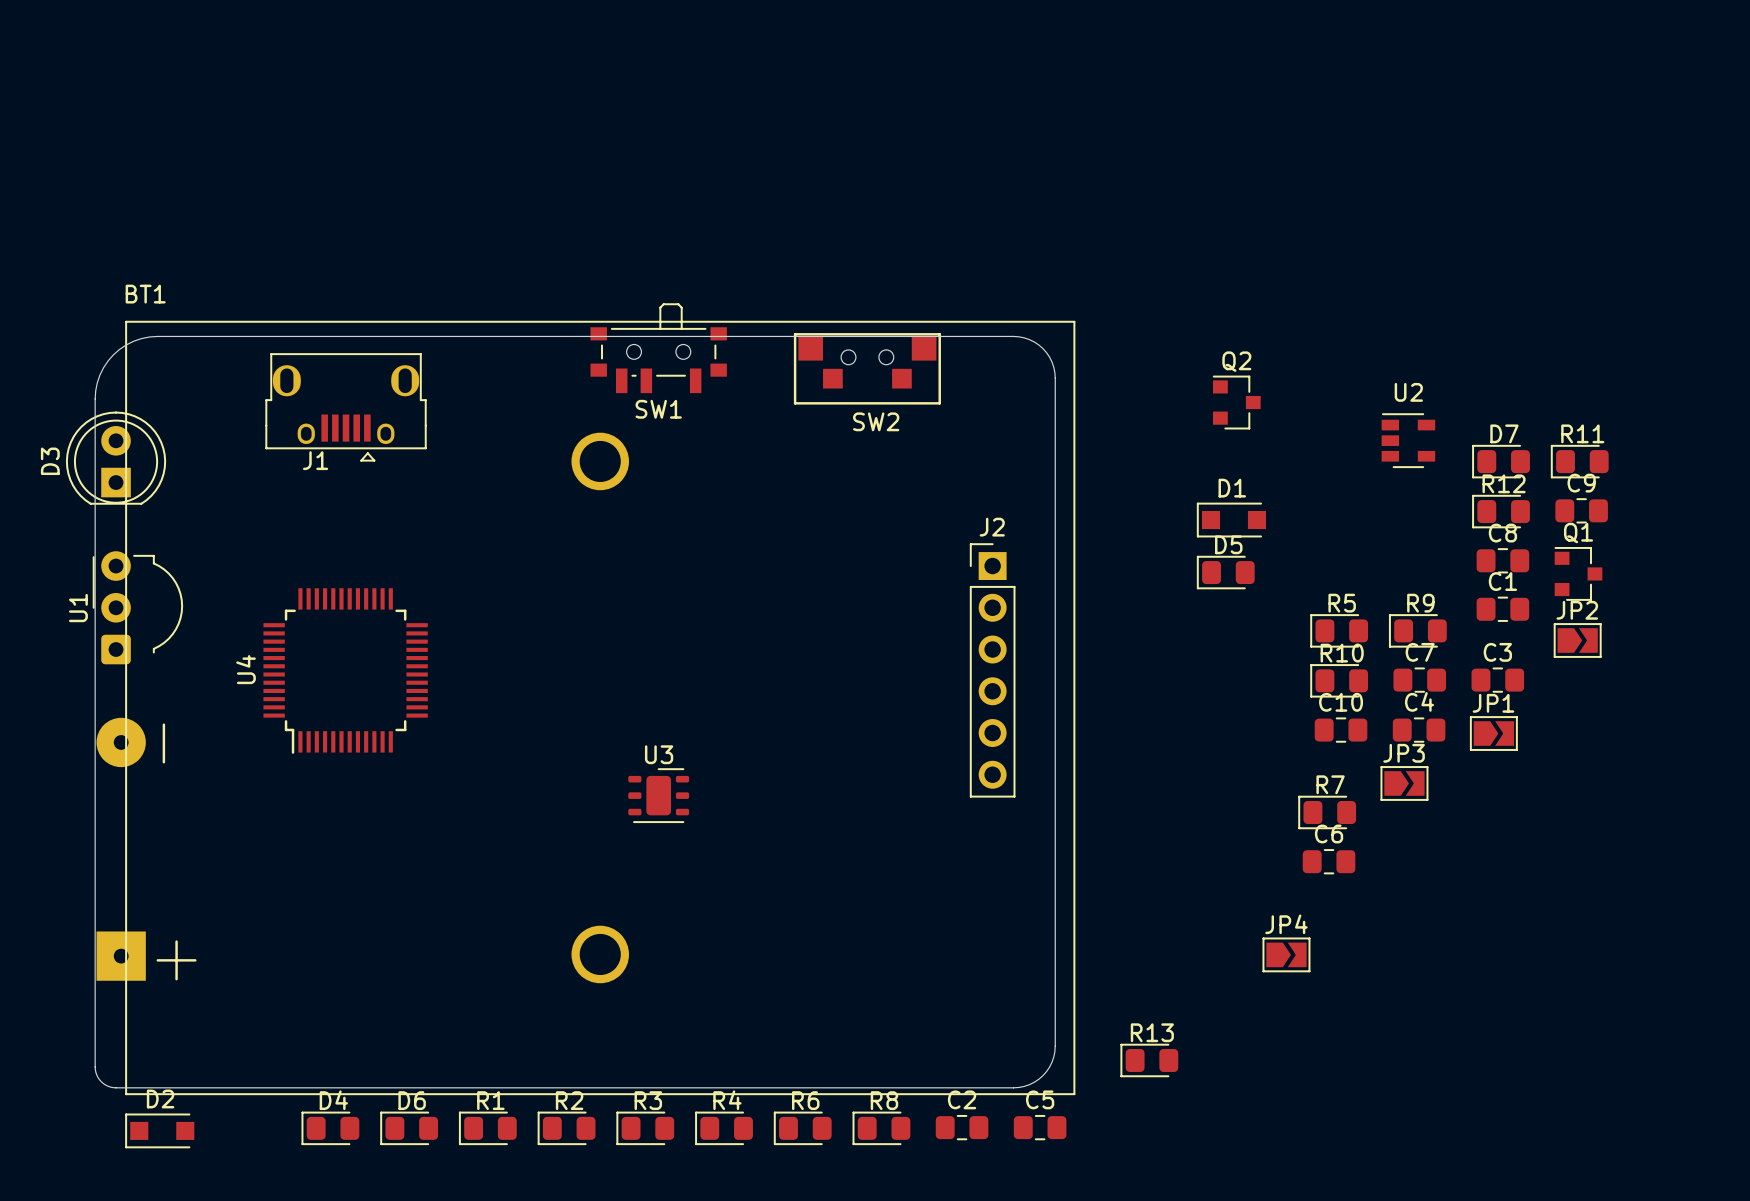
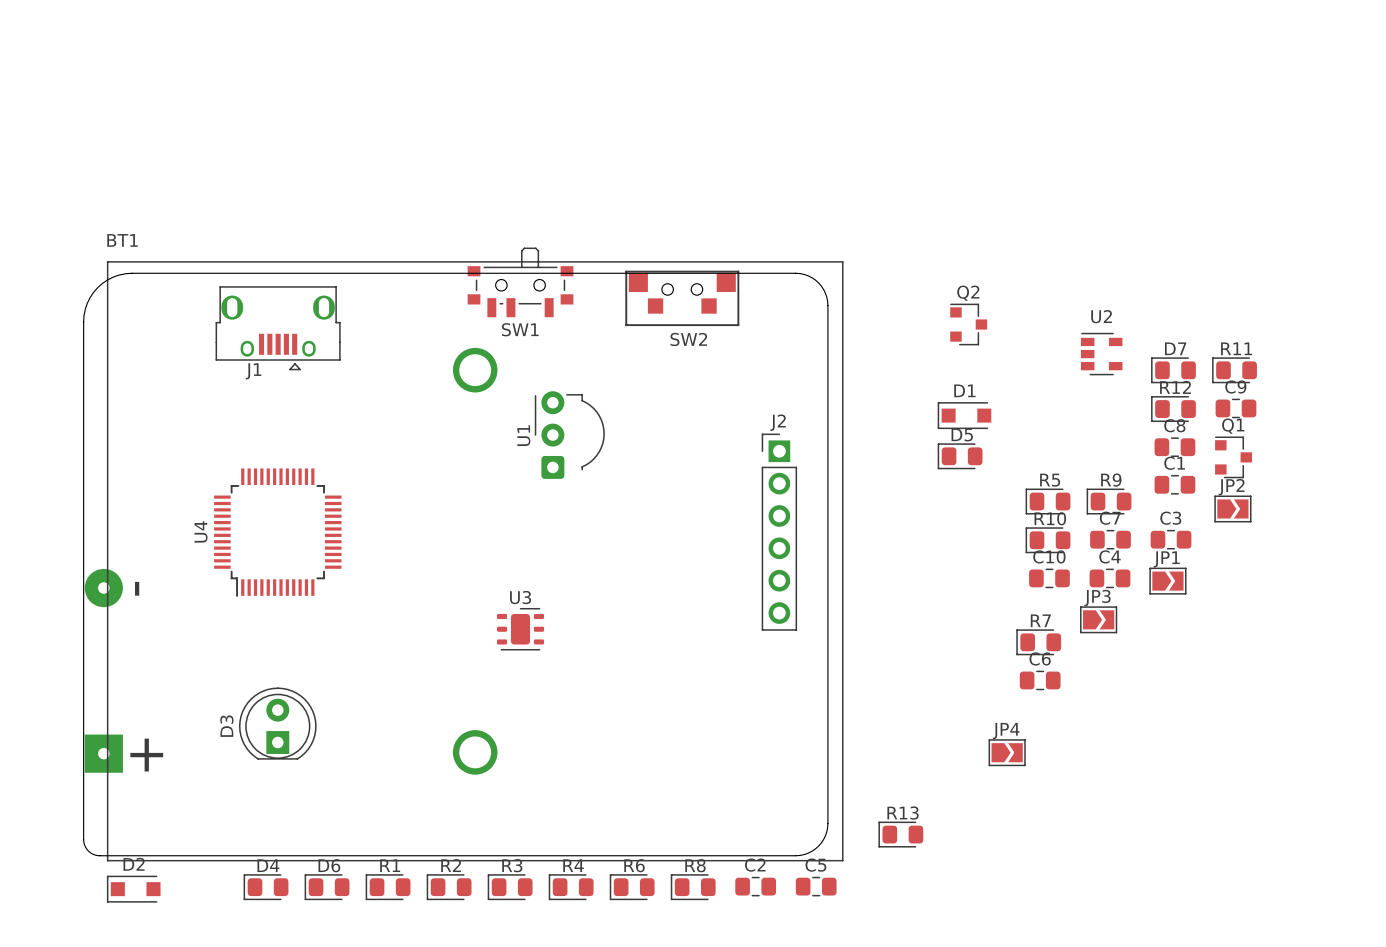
D3 position: (116, 458) -> (277, 723)
U1 position: (137, 607) -> (569, 435)

